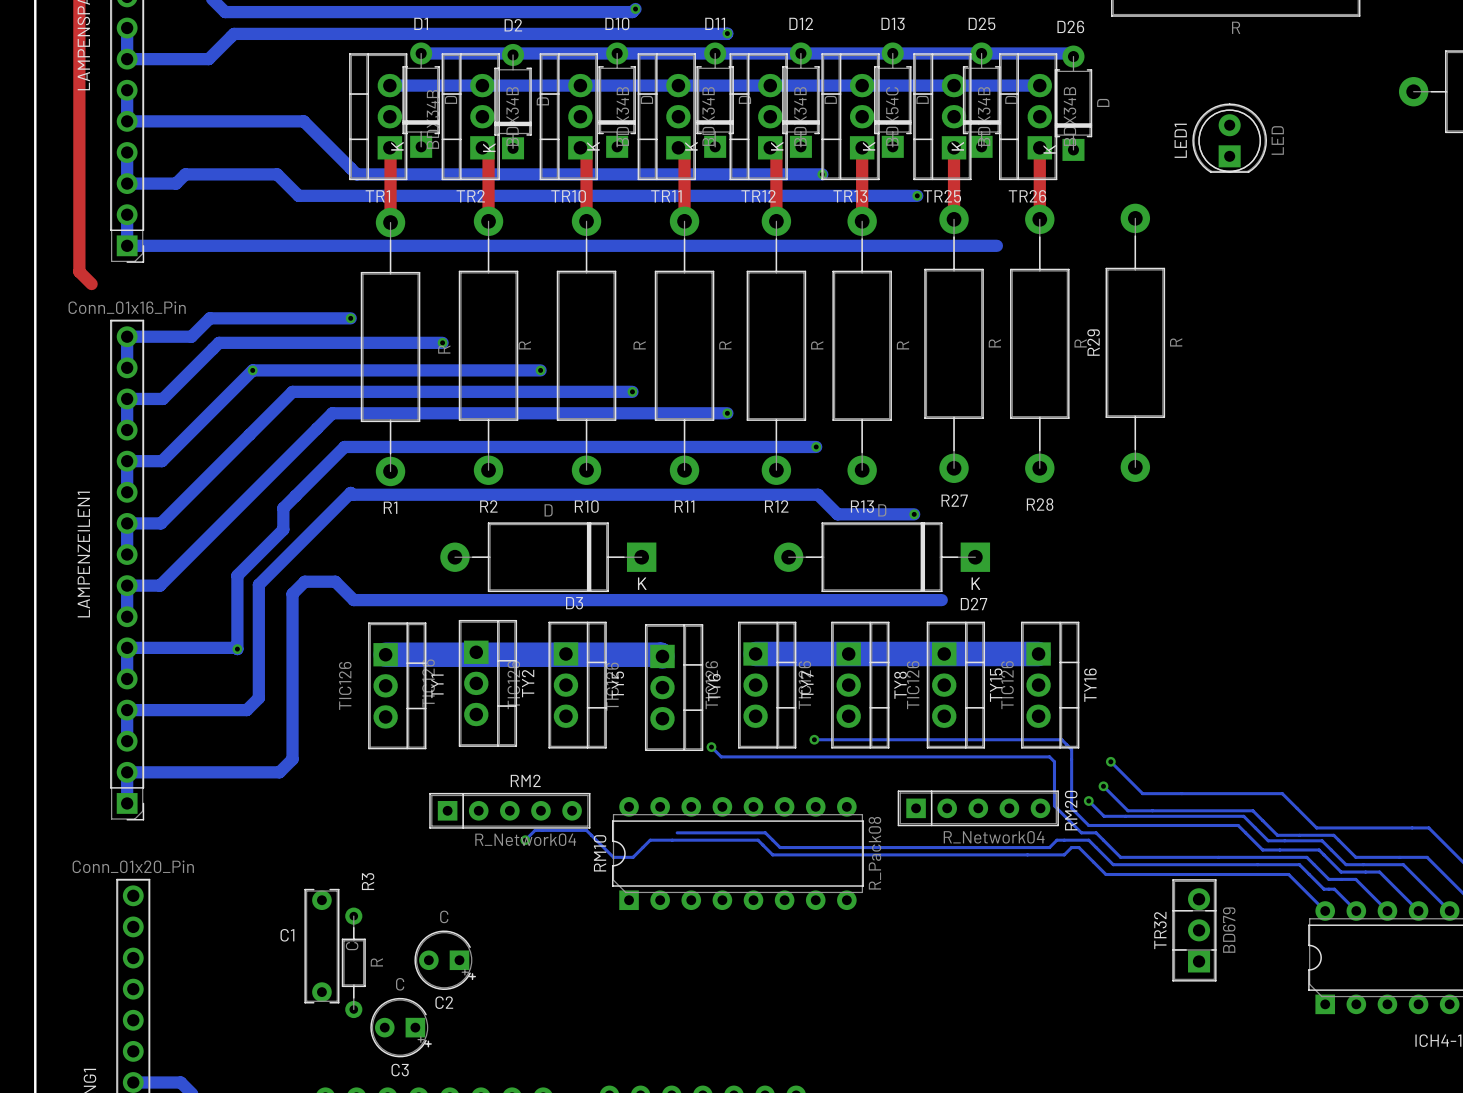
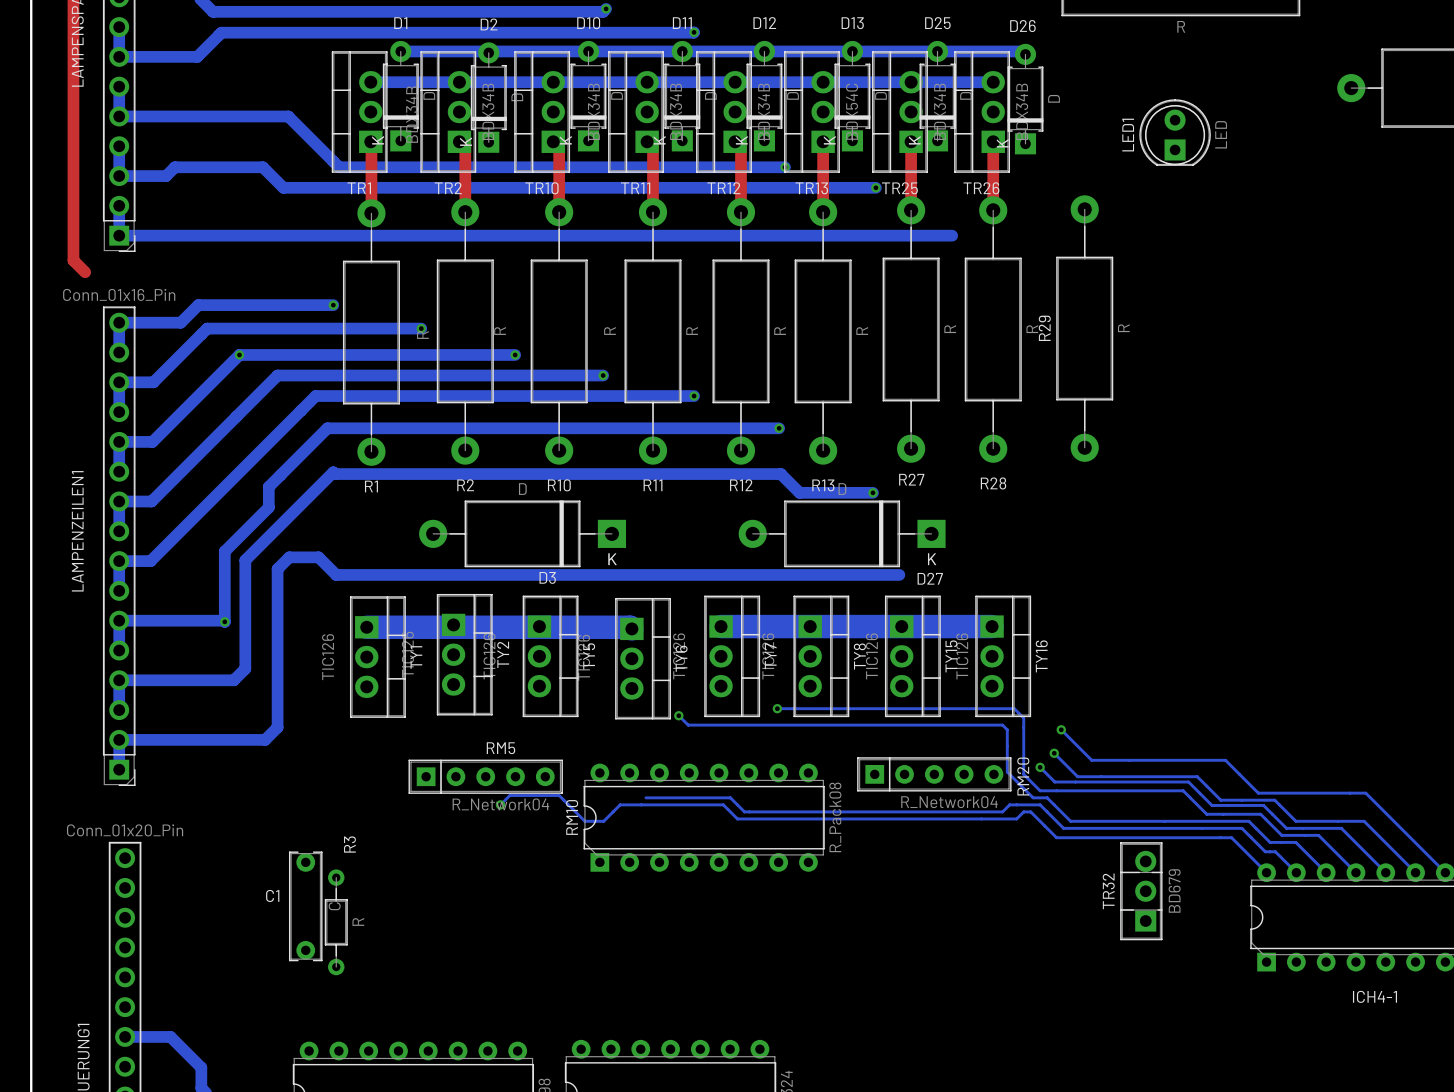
RM2 name: RM2 (525, 780) -> RM5 (500, 748)
C2: C (445, 960) -> none
C3: C (401, 1027) -> none

